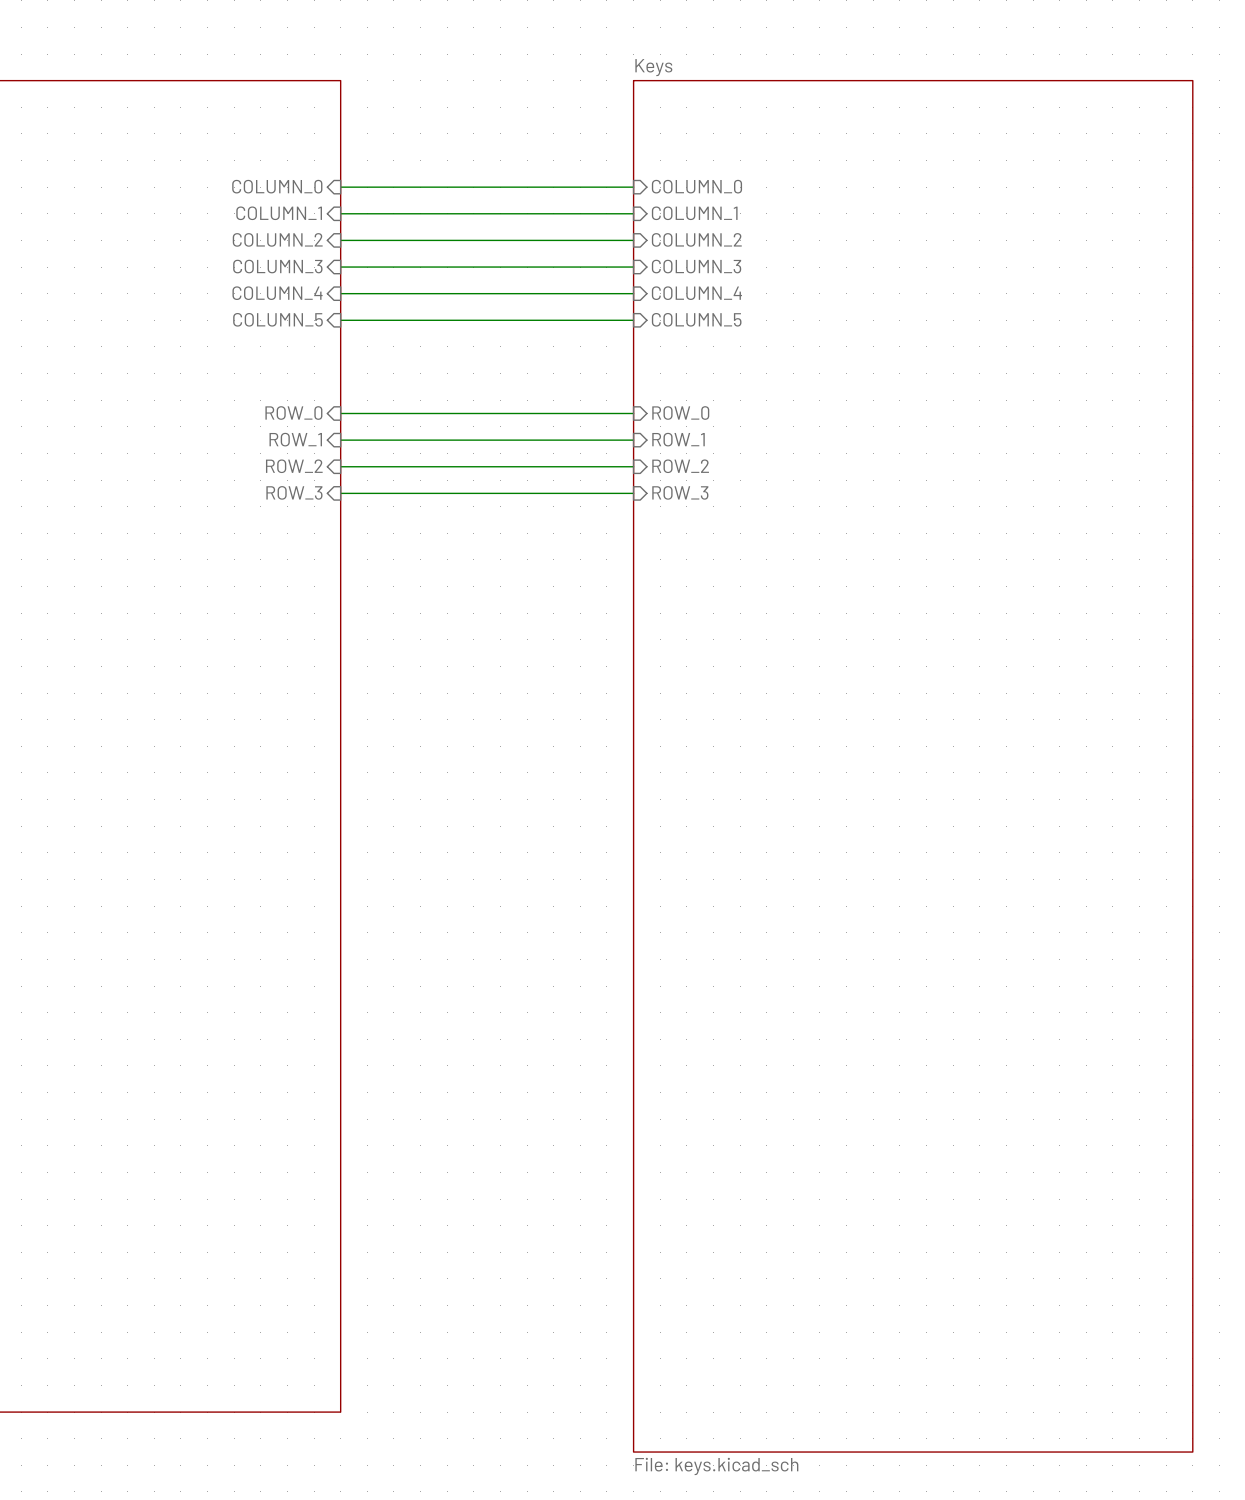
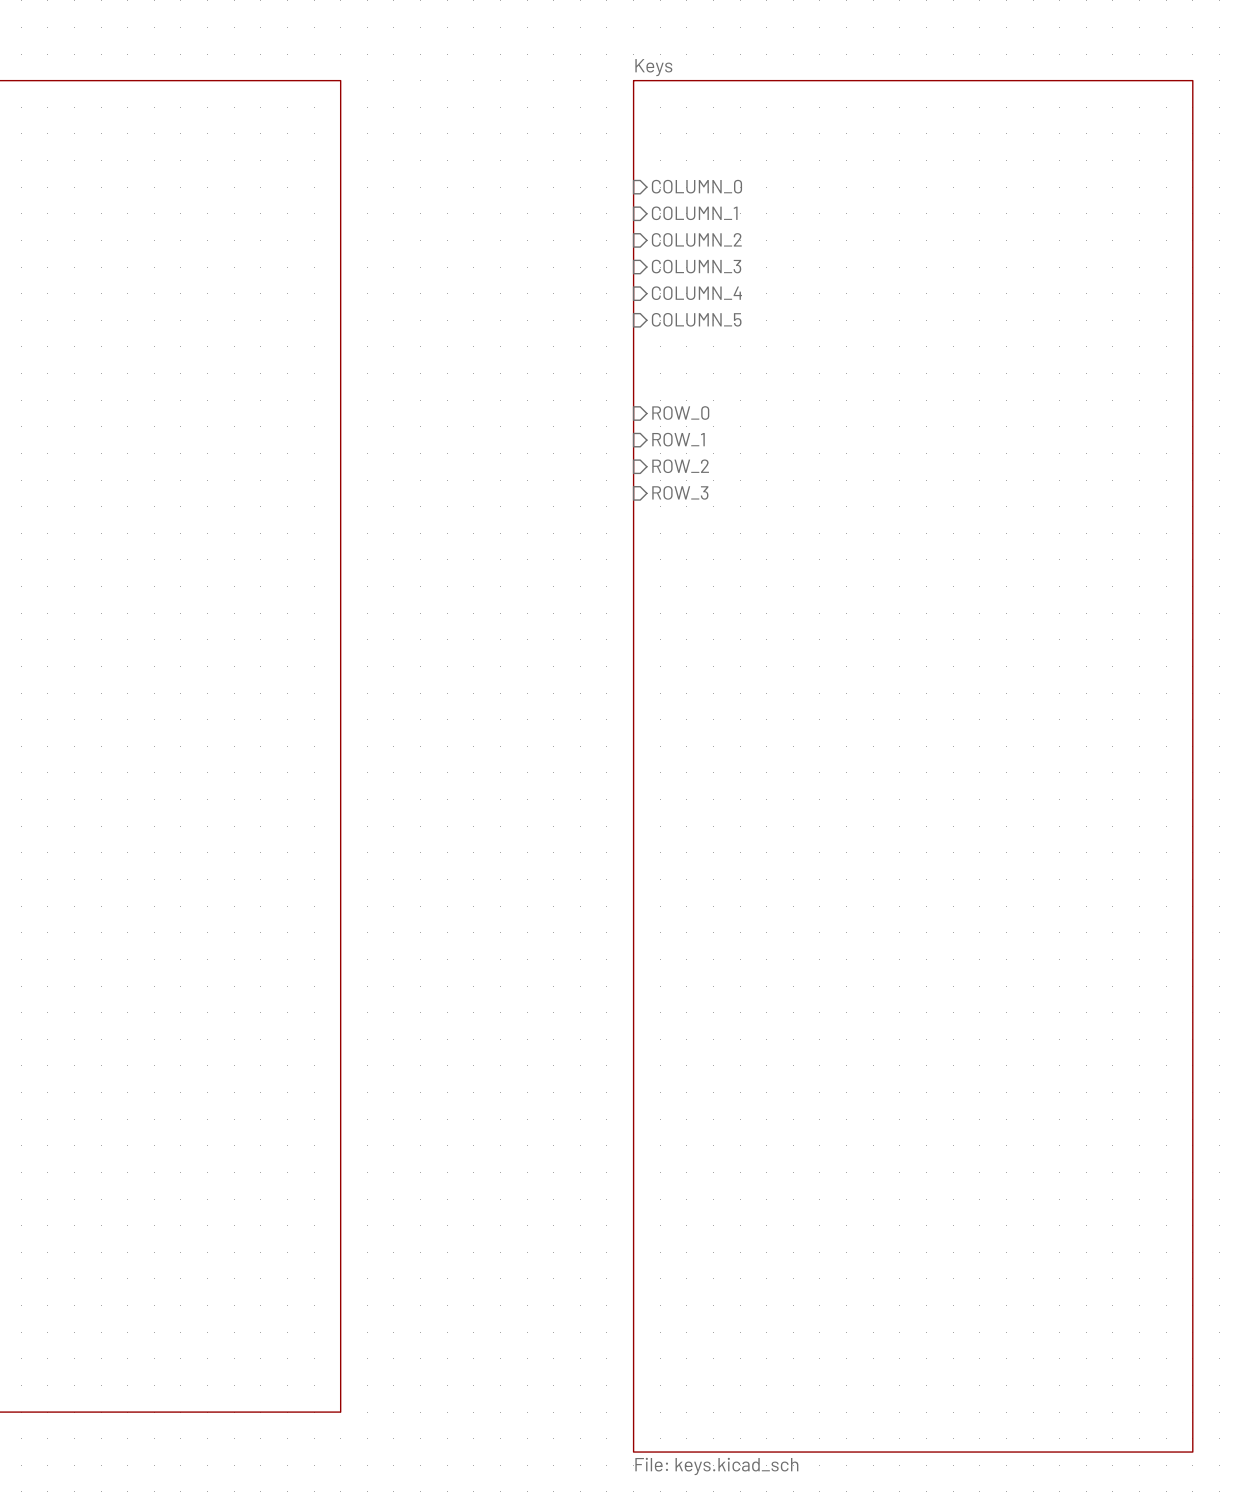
sheet pin: COLUMN_0 (277, 186) -> none
wire: (340, 187) (633, 187) -> none
sheet pin: COLUMN_1 (279, 213) -> none
wire: (340, 213) (633, 213) -> none
sheet pin: COLUMN_2 (277, 239) -> none
wire: (340, 240) (633, 240) -> none
sheet pin: COLUMN_3 (277, 266) -> none
wire: (340, 267) (633, 267) -> none
sheet pin: COLUMN_4 (277, 293) -> none
wire: (340, 293) (633, 293) -> none
sheet pin: COLUMN_5 (277, 319) -> none
wire: (340, 320) (633, 320) -> none
sheet pin: ROW_0 (293, 413) -> none
wire: (340, 413) (633, 413) -> none
sheet pin: ROW_1 (295, 439) -> none
wire: (340, 440) (633, 440) -> none
sheet pin: ROW_2 (294, 466) -> none
wire: (340, 466) (633, 466) -> none
sheet pin: ROW_3 (294, 492) -> none
wire: (340, 493) (633, 493) -> none

